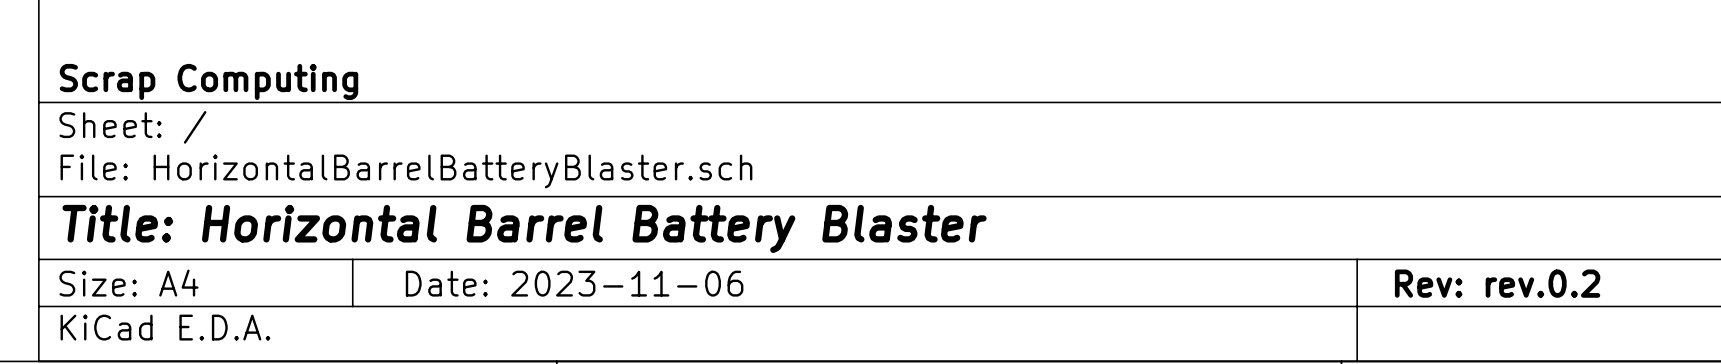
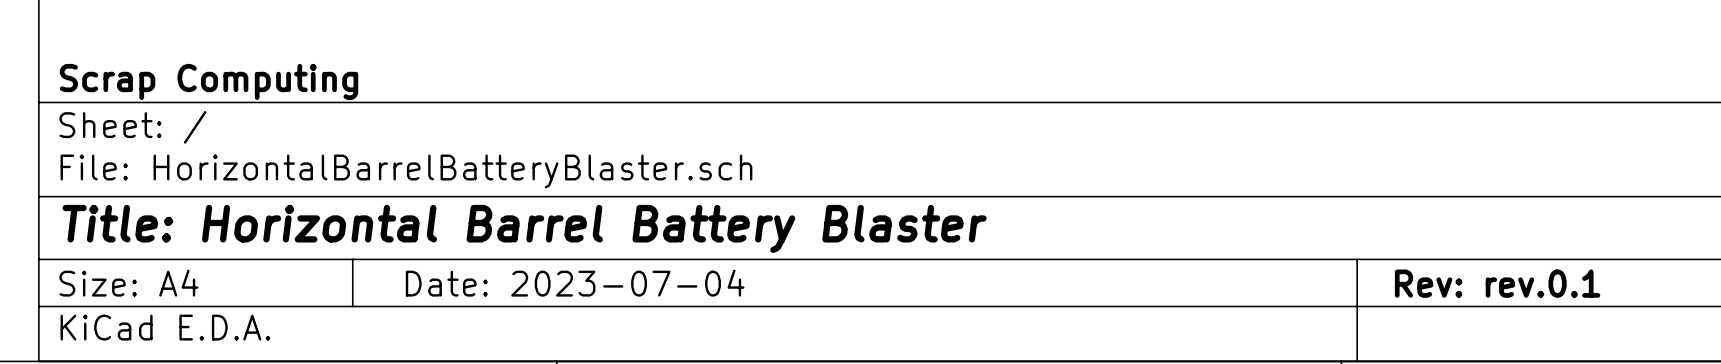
title block: Date: 2023-11-06 (574, 283) -> Date: 2023-07-04 (575, 283)
title block: Rev: rev.0.2 (1497, 283) -> Rev: rev.0.1 (1497, 283)

